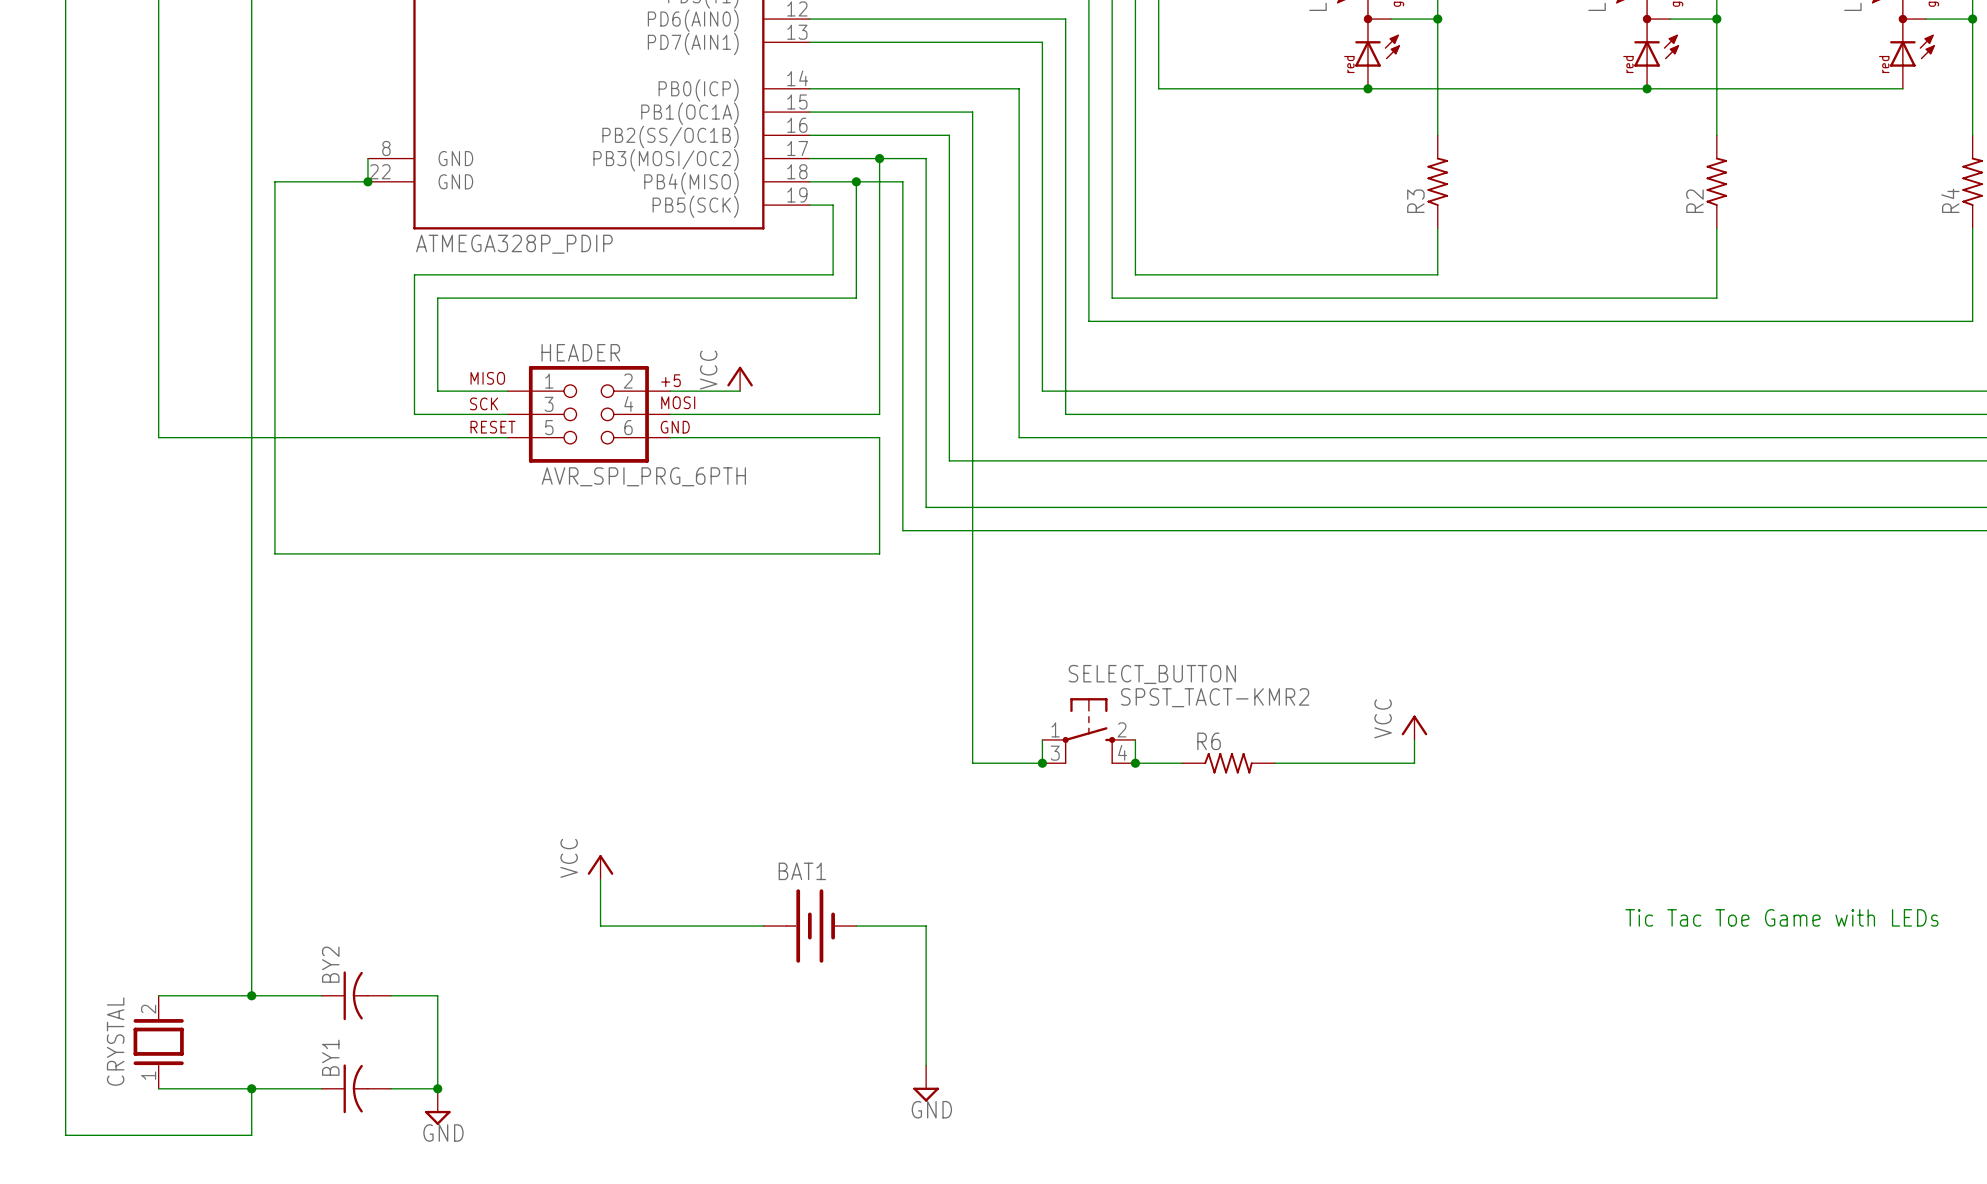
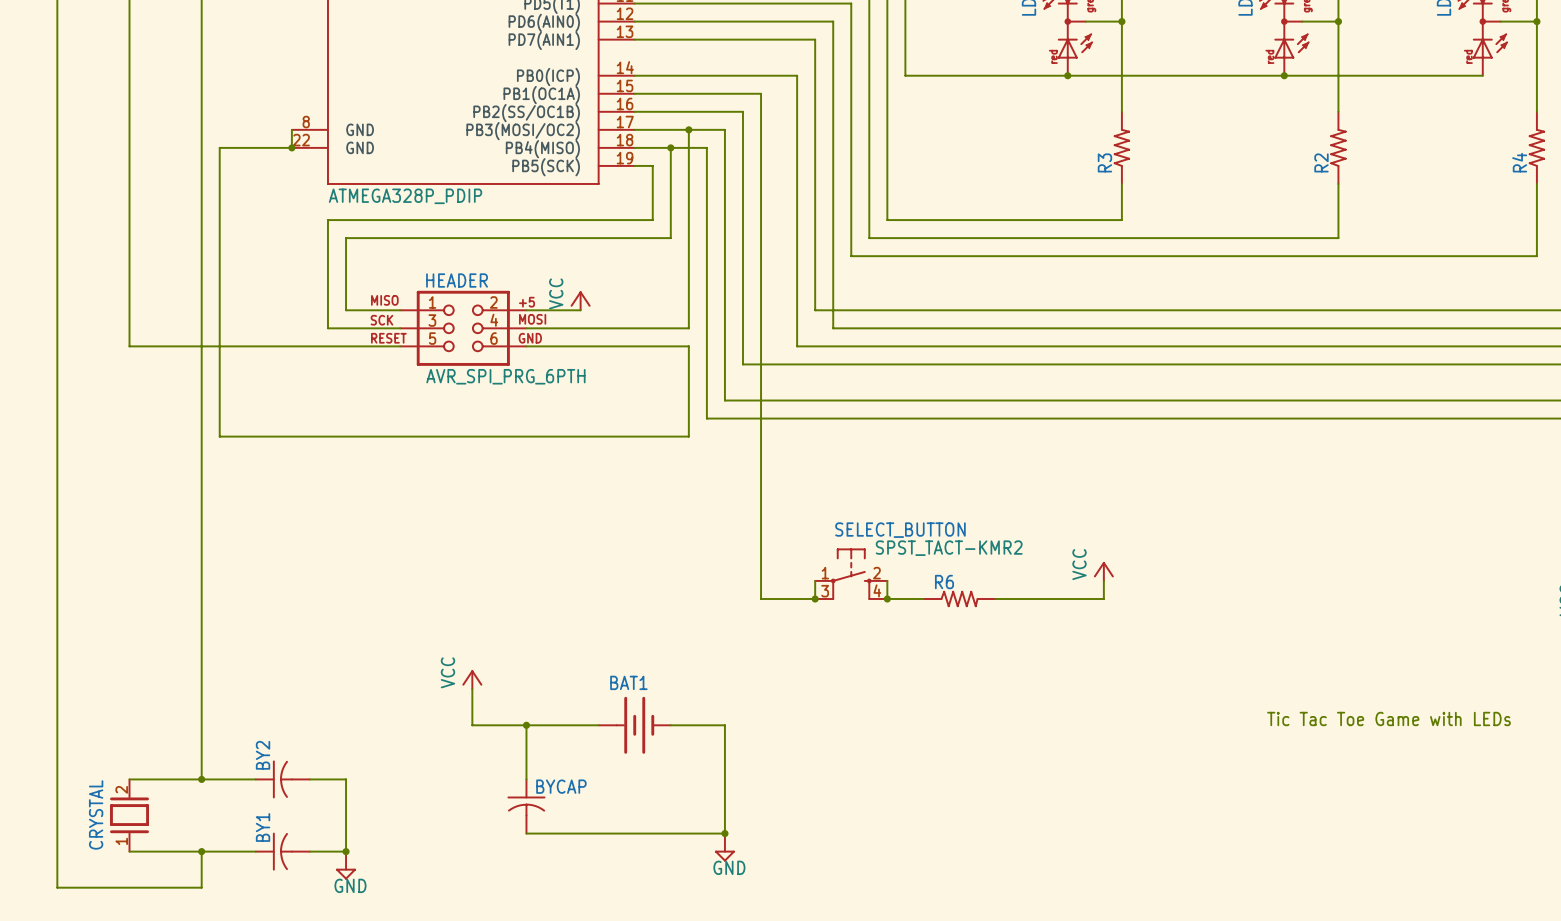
wire: none -> (526, 725) (526, 779)
junction: none -> (526, 725)
BYCAP: none -> (526, 806)
wire: none -> (526, 833) (724, 833)
junction: none -> (724, 833)

